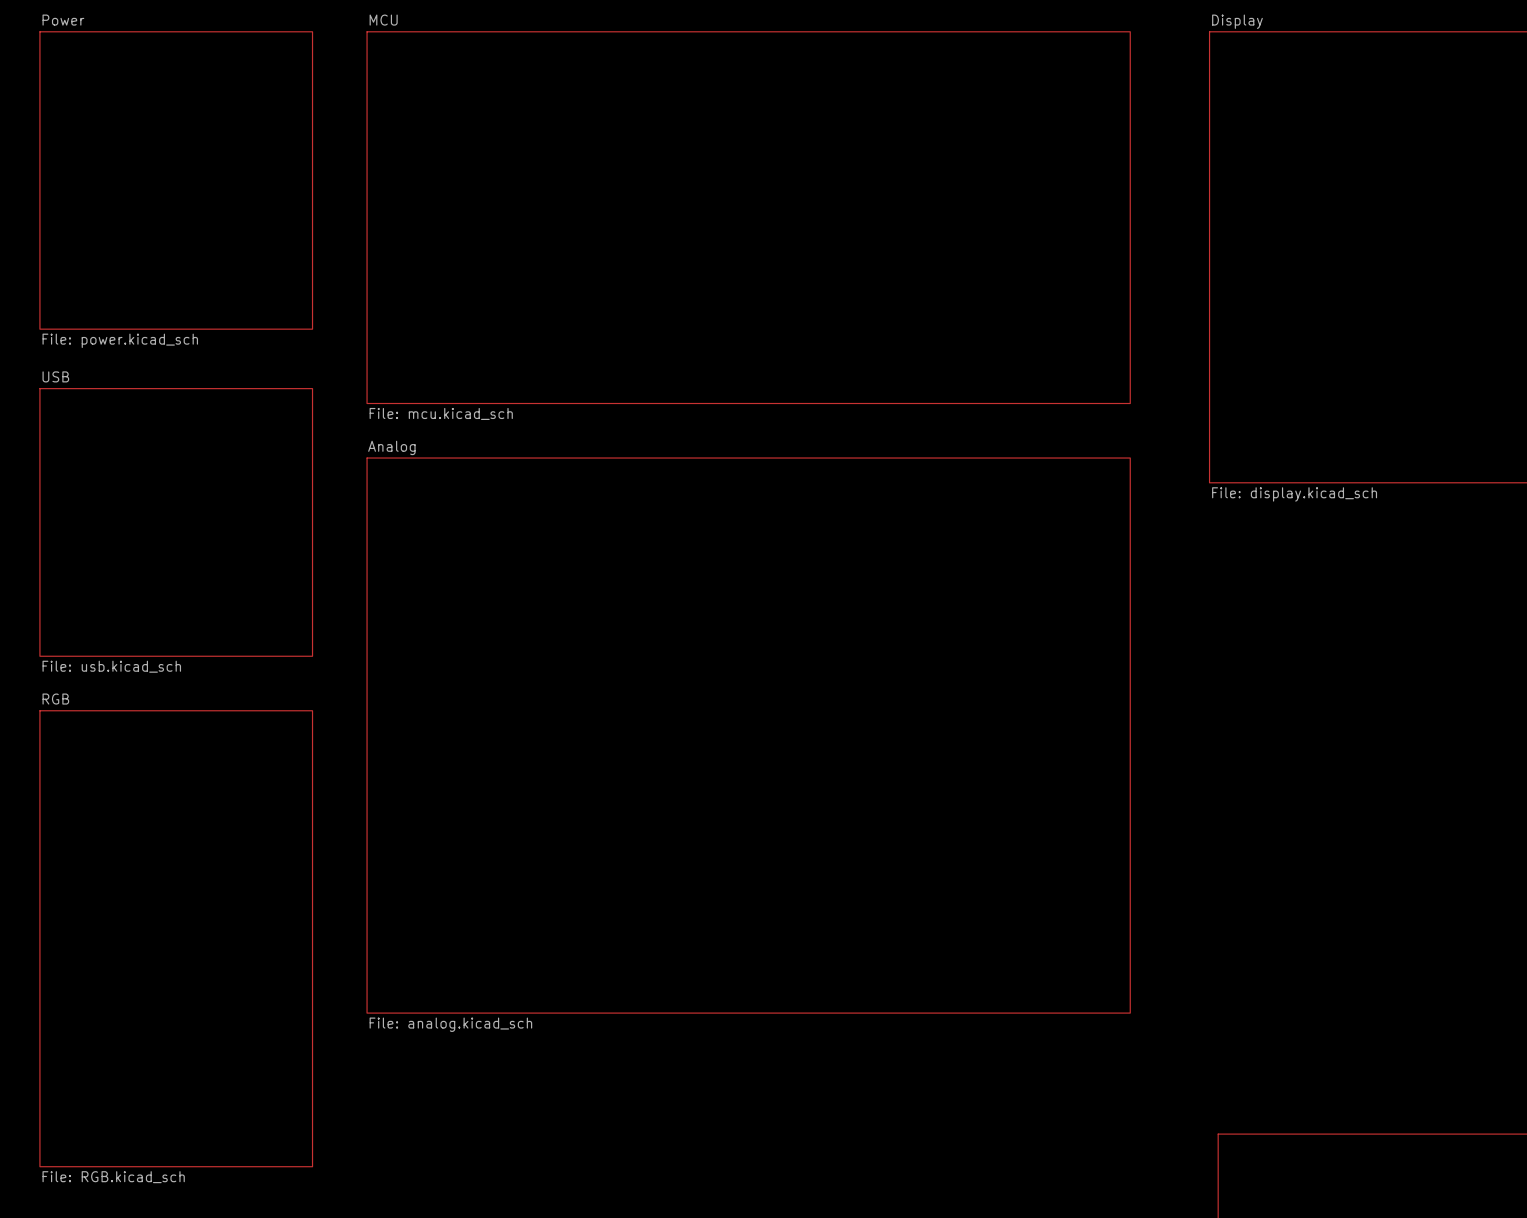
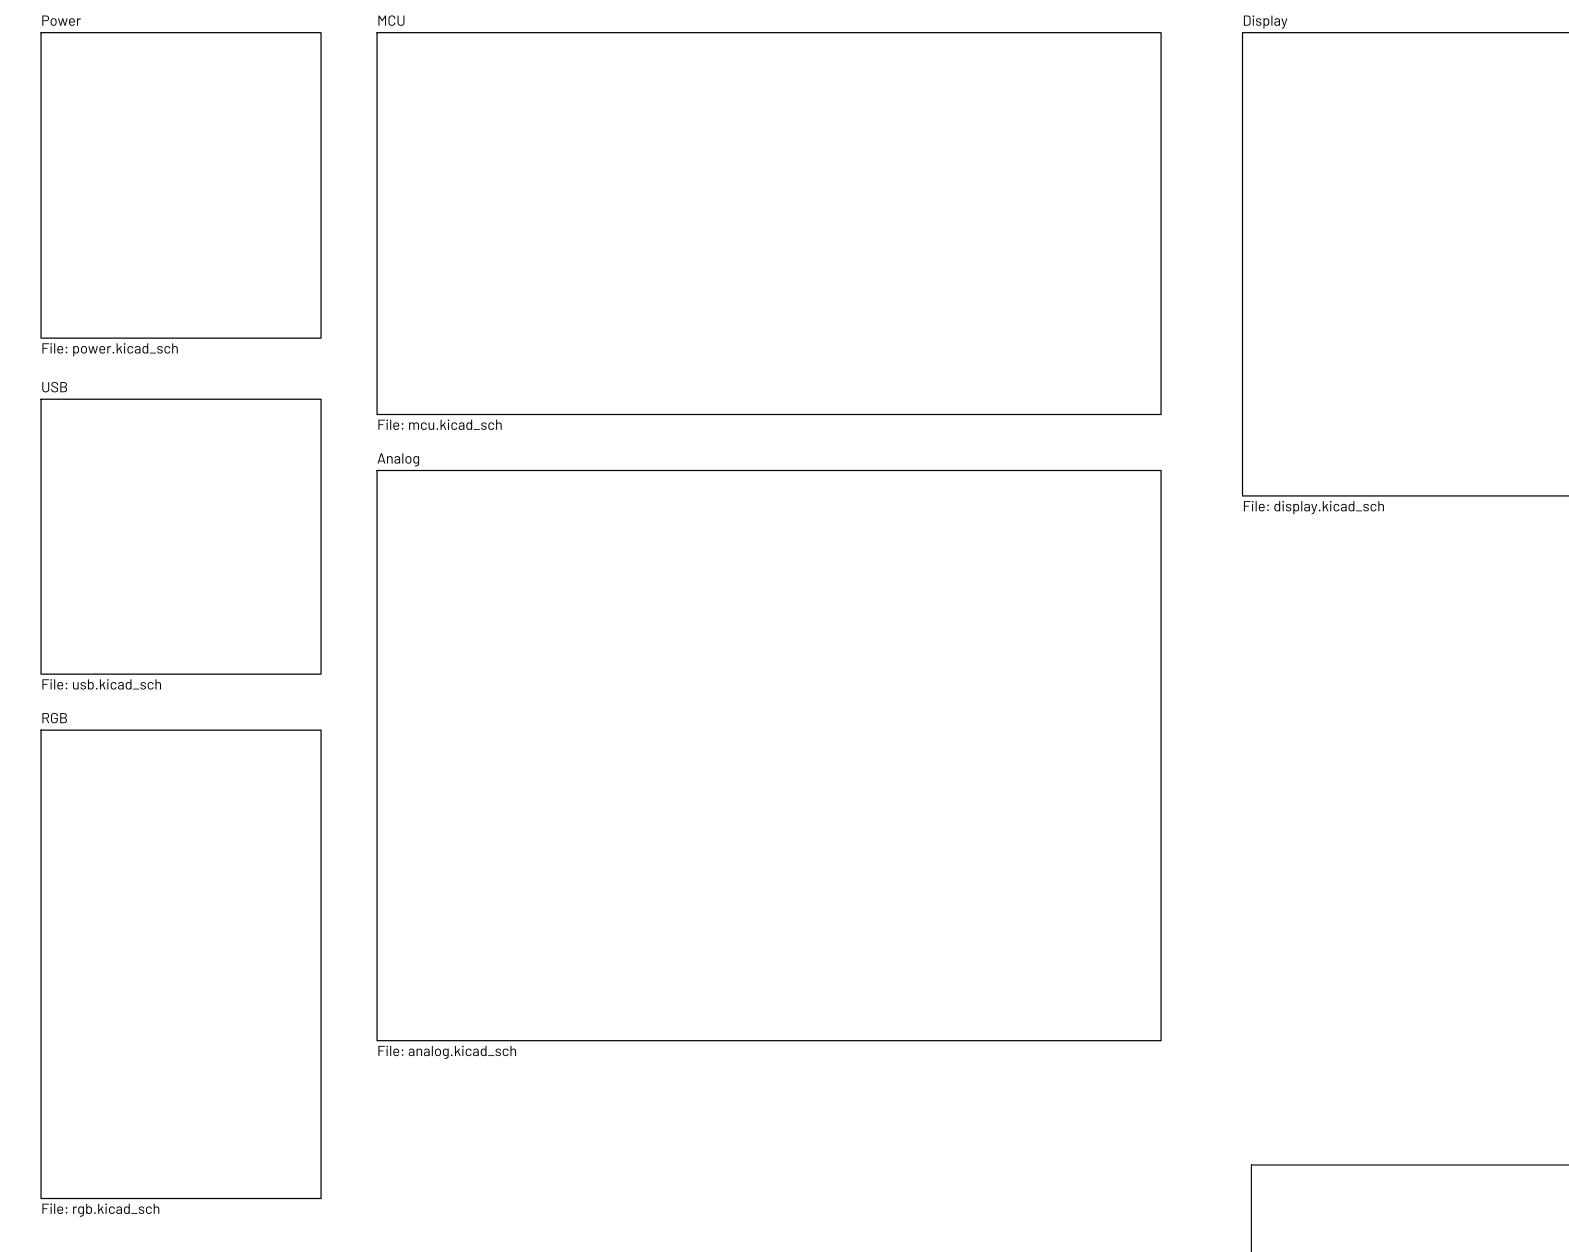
sheet RGB value: File: RGB.kicad_sch (113, 1177) -> File: rgb.kicad_sch (100, 1210)

